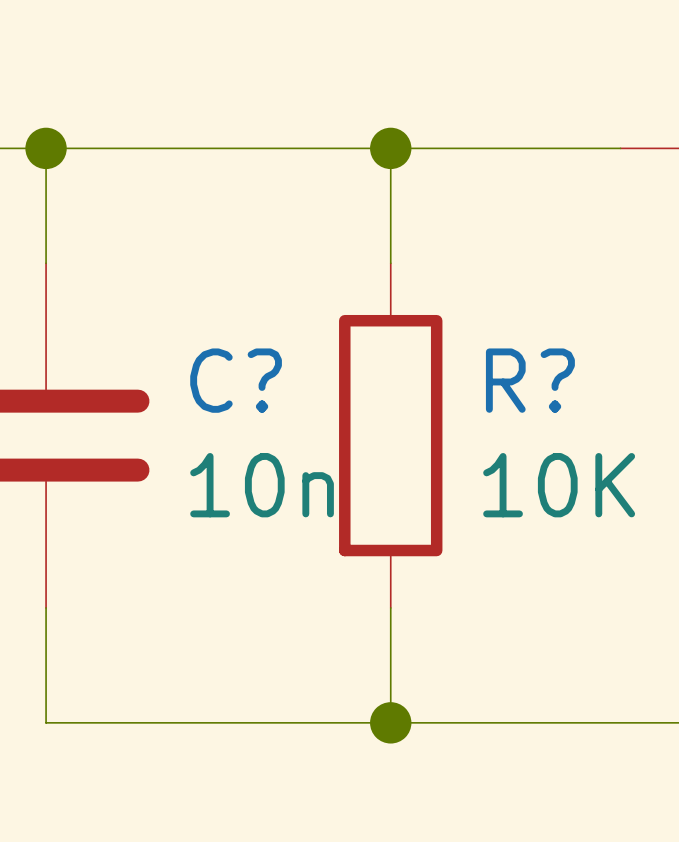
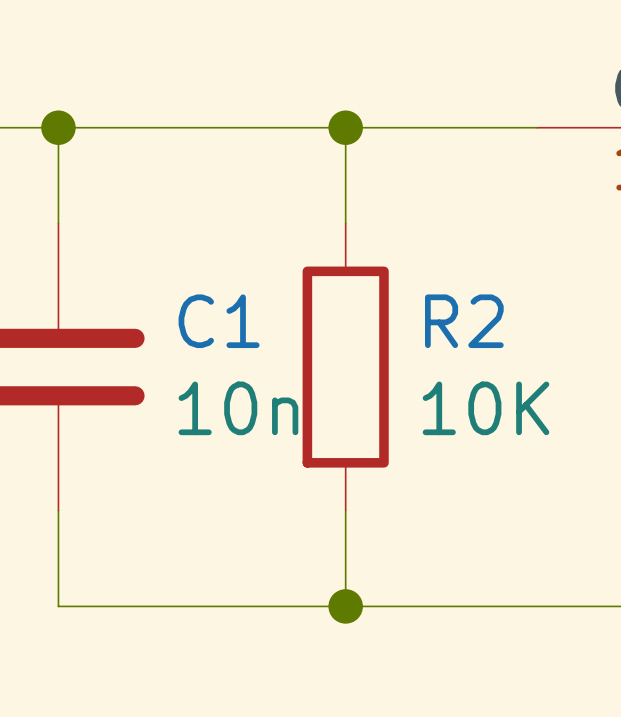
C? name: C? (236, 380) -> C1 (219, 321)
R? name: R? (530, 380) -> R2 (464, 321)

